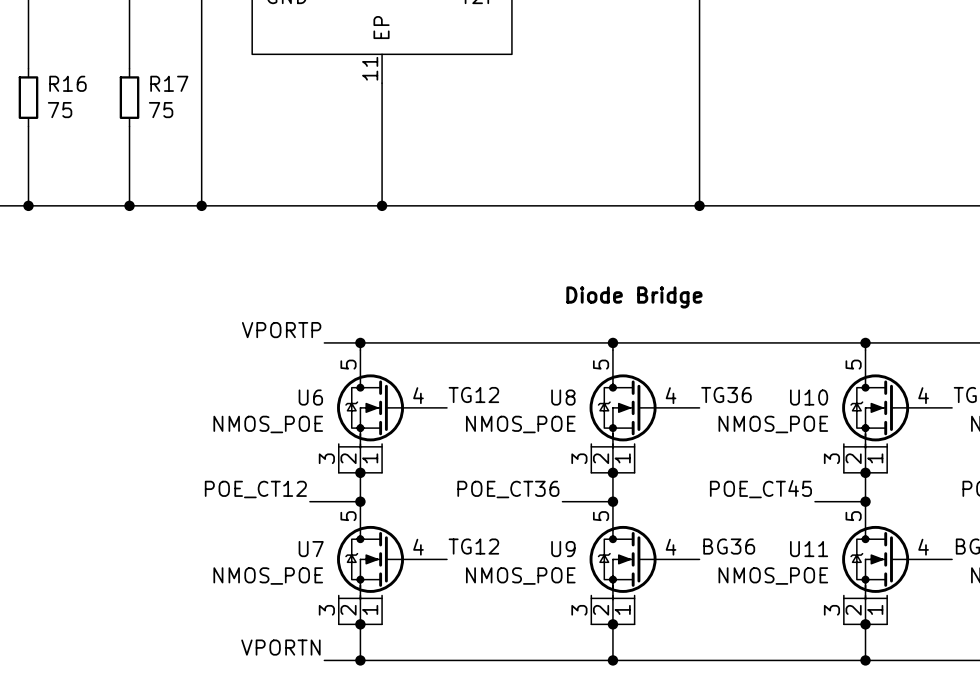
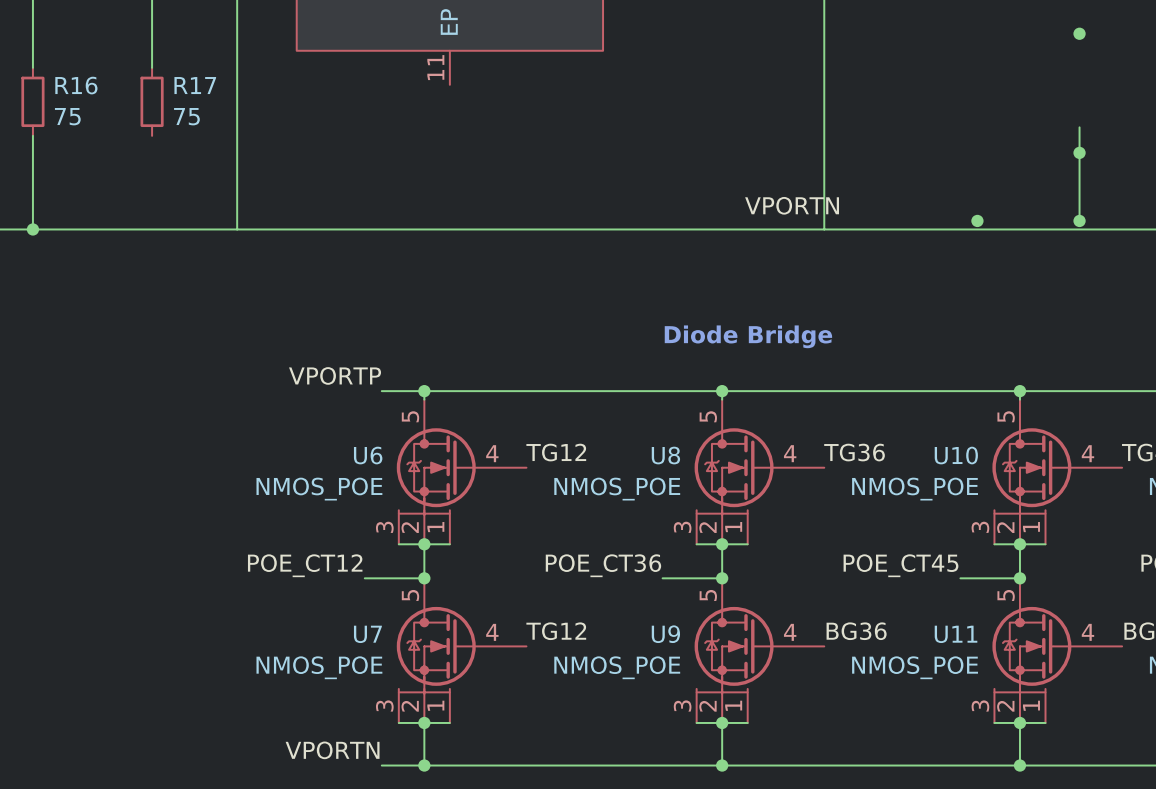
junction: none -> (1079, 33)
wire: (382, 83) (382, 205) -> none
wire: none -> (1079, 127) (1079, 220)
wire: (129, 126) (129, 205) -> none
junction: none -> (1079, 152)
label: none -> VPORTN (792, 205)
junction: none -> (977, 220)
junction: none -> (1079, 220)
junction: (129, 205) -> none
junction: (201, 205) -> none
junction: (382, 205) -> none
junction: (699, 205) -> none

